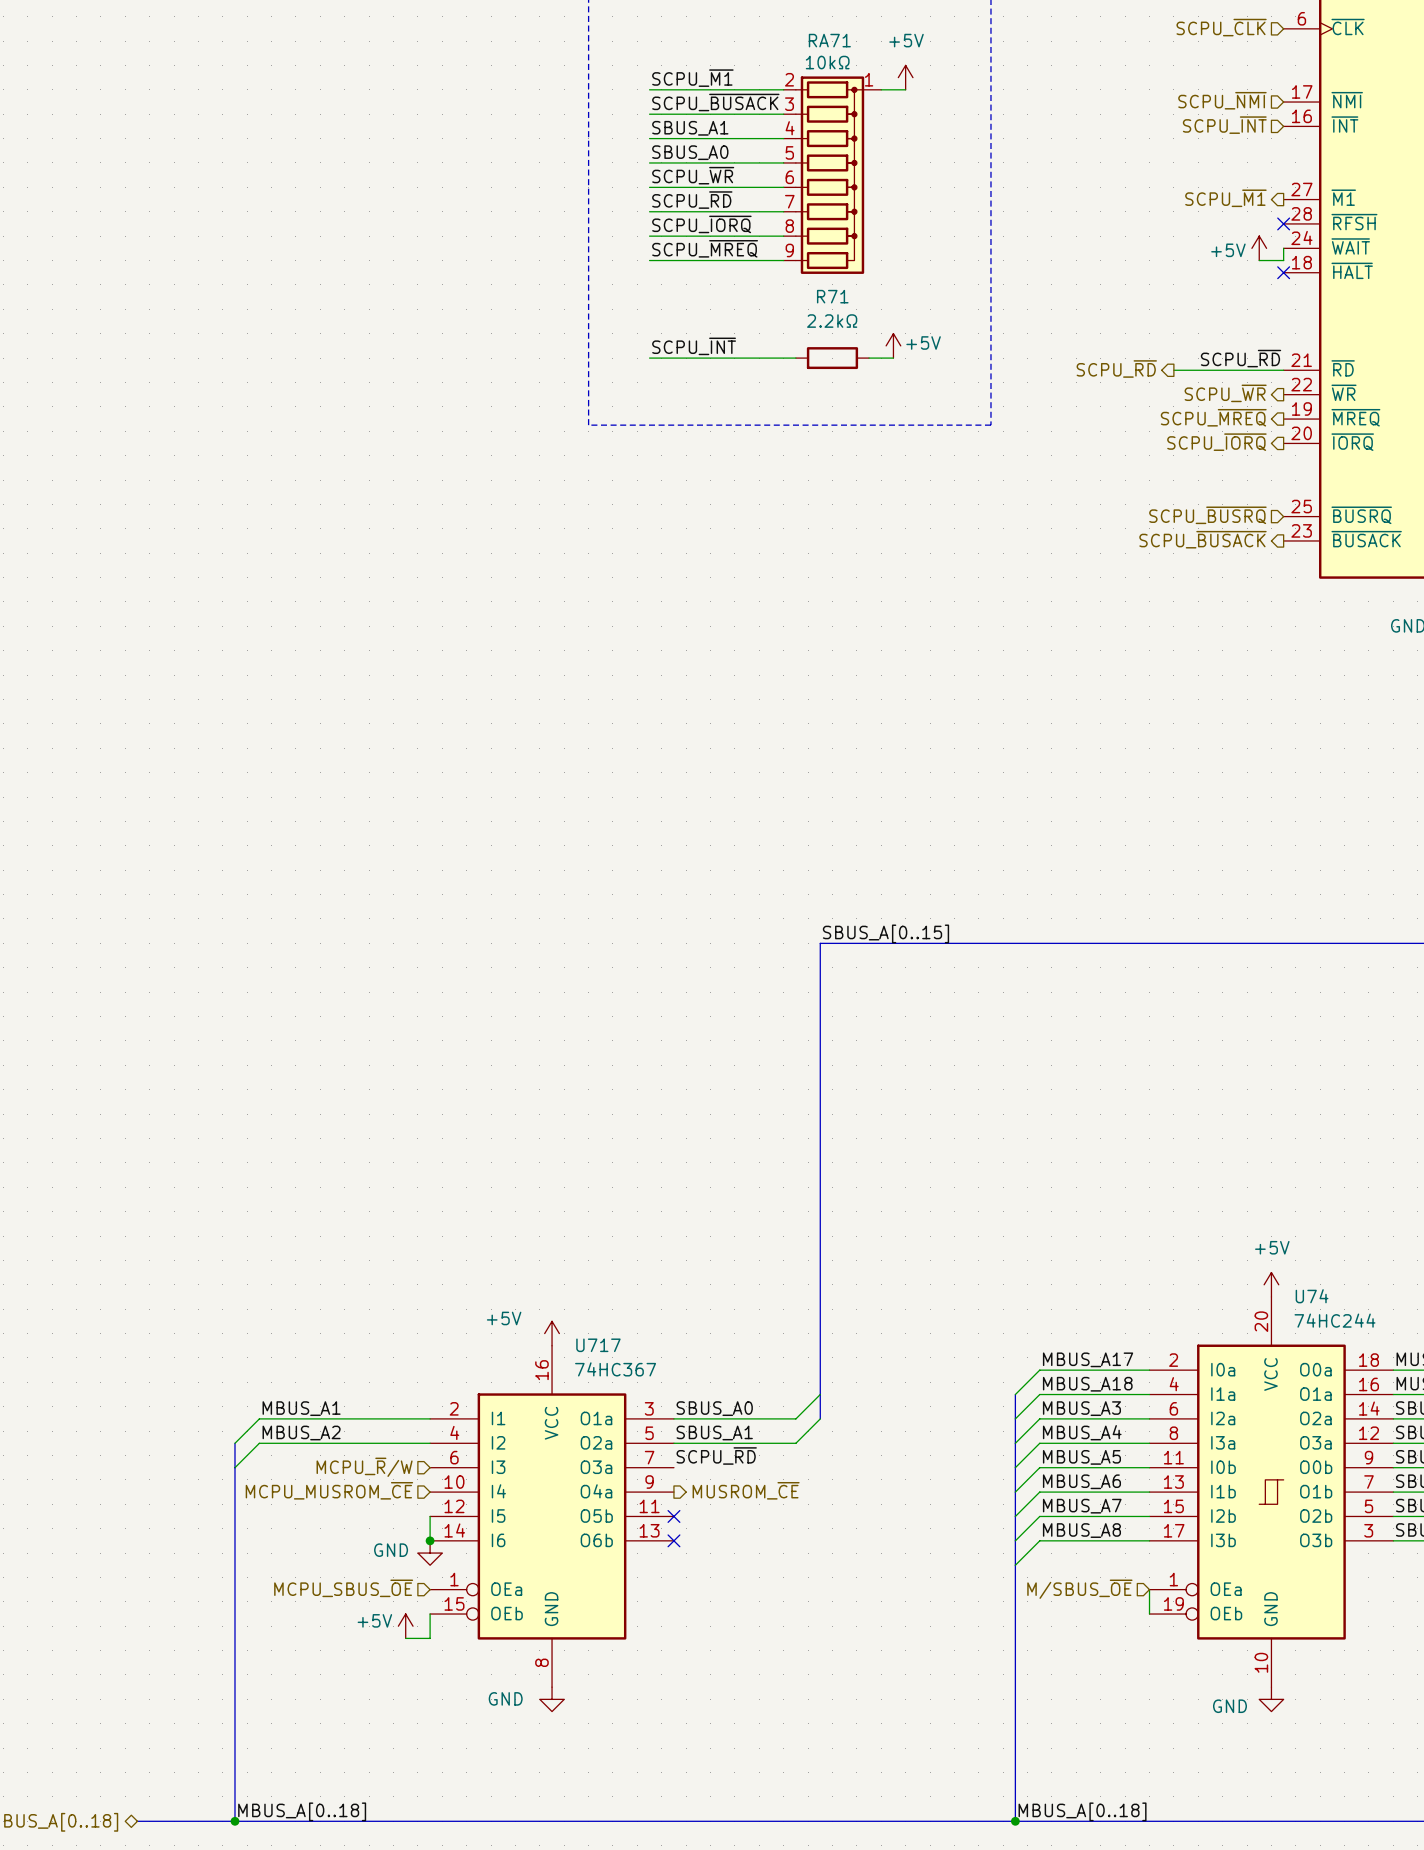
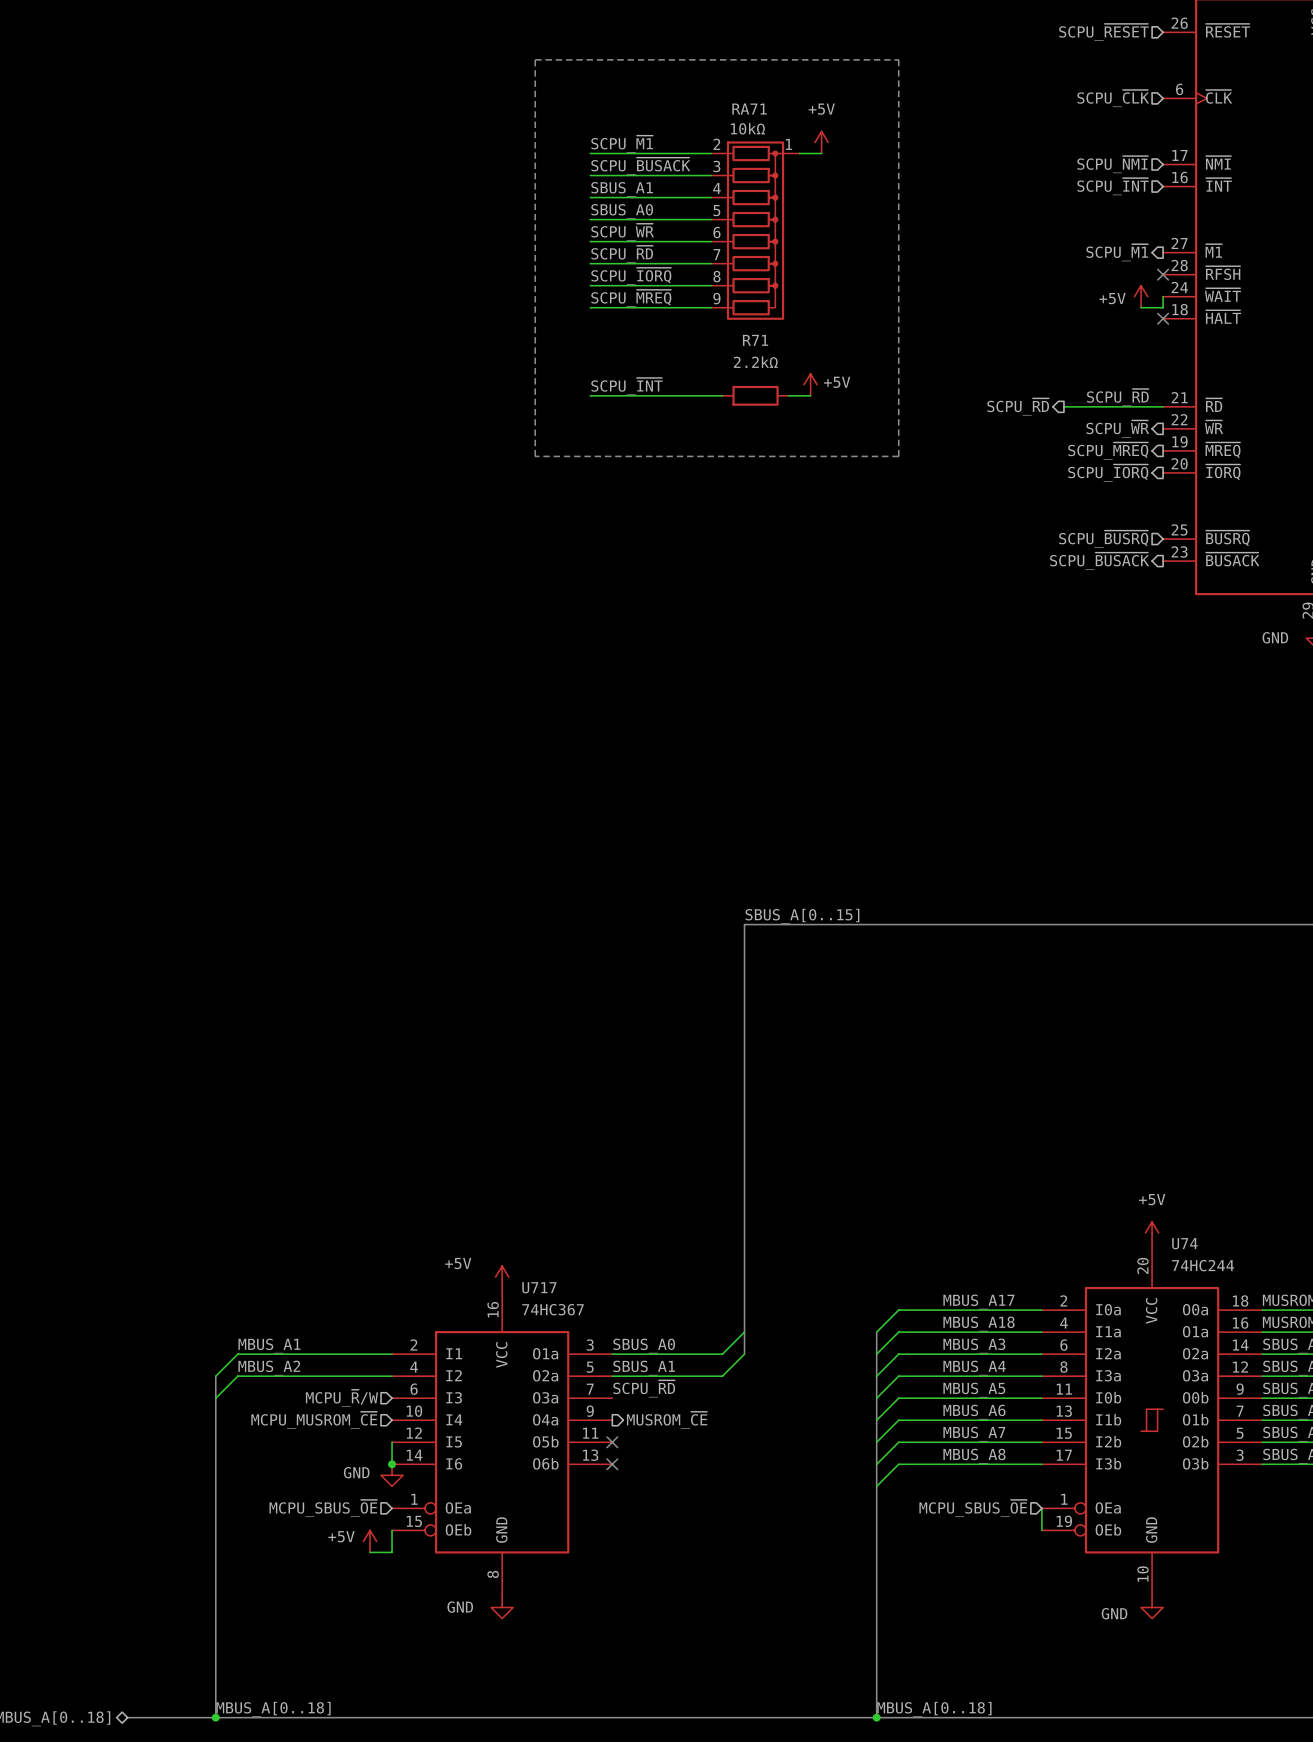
wire: (1039, 1370) (1015, 1394) -> (942, 1310) (898, 1310) (876, 1332)
bus: (1015, 1394) (1015, 1821) -> (876, 1332) (876, 1717)
wire: (1039, 1394) (1015, 1418) -> (942, 1332) (898, 1332) (876, 1354)
wire: (1039, 1418) (1015, 1443) -> (942, 1354) (898, 1354) (876, 1376)
wire: (1039, 1443) (1015, 1467) -> (942, 1376) (898, 1376) (876, 1398)
wire: (1039, 1467) (1015, 1492) -> (942, 1398) (898, 1398) (876, 1420)
wire: (1039, 1492) (1015, 1516) -> (942, 1420) (898, 1420) (876, 1442)
wire: (1039, 1516) (1015, 1540) -> (942, 1442) (898, 1442) (876, 1464)
wire: (1039, 1540) (1015, 1565) -> (942, 1464) (898, 1464) (876, 1486)
hierarchical label: M/SBUS_~{OE} (1079, 1589) -> MCPU_SBUS_~{OE} (973, 1508)
label position: MBUS_A[0..18] (1082, 1811) -> MBUS_A[0..18] (934, 1709)
junction position: (1015, 1821) -> (876, 1717)

